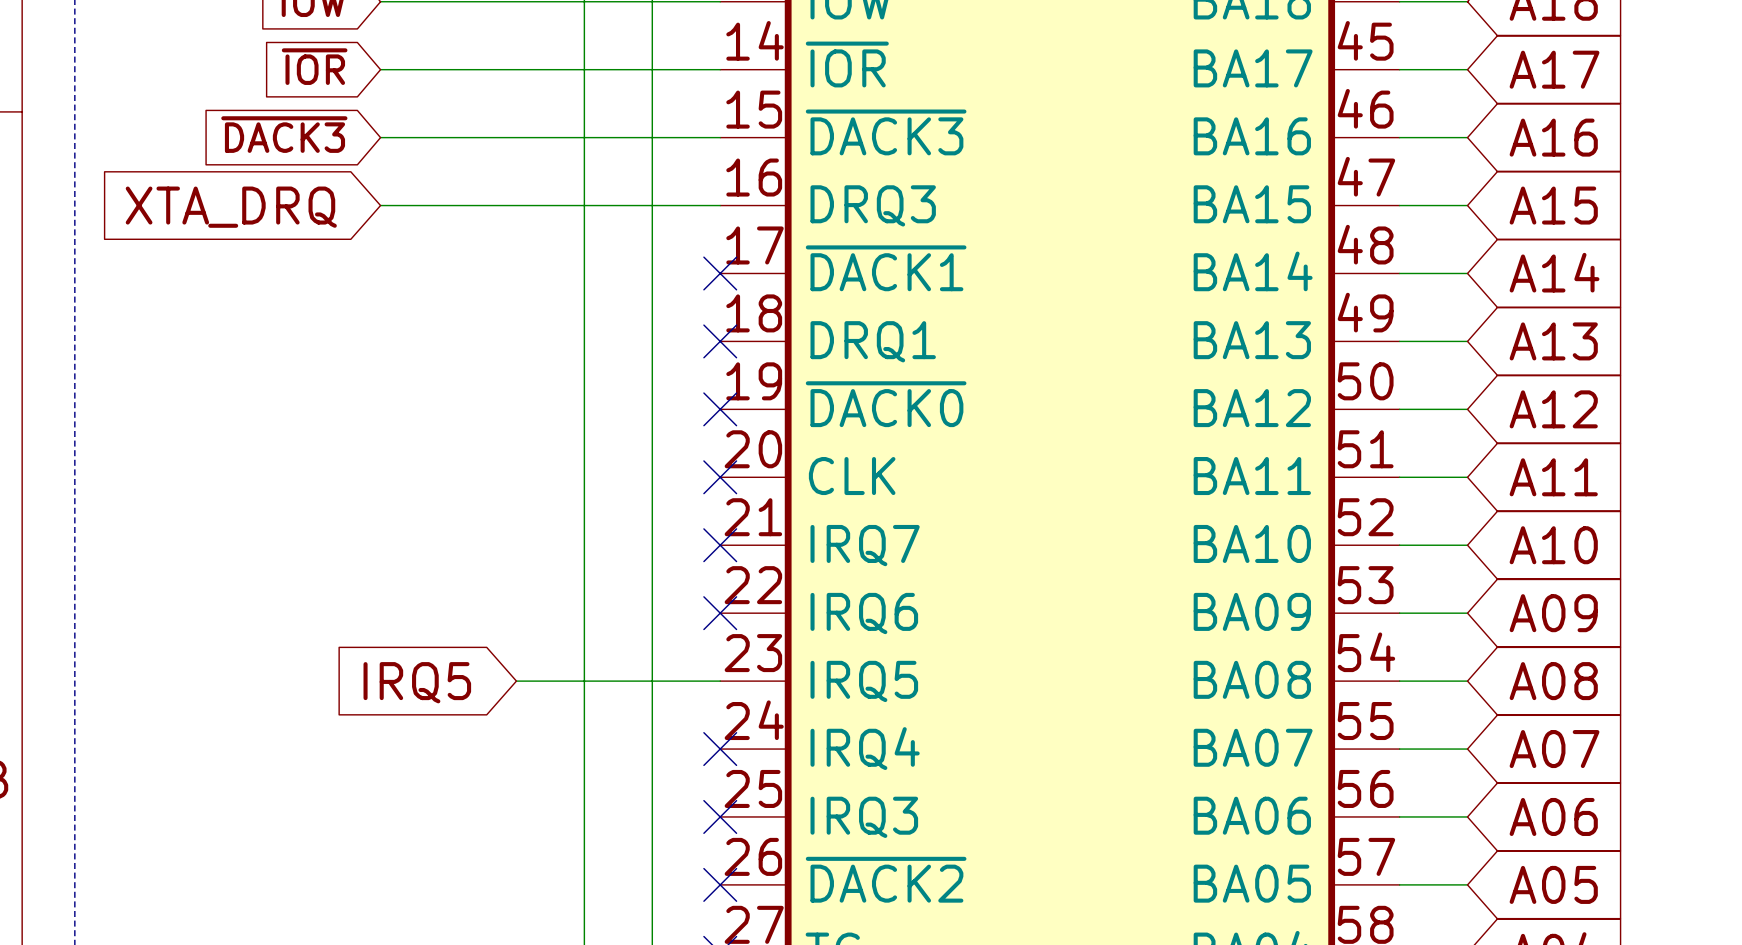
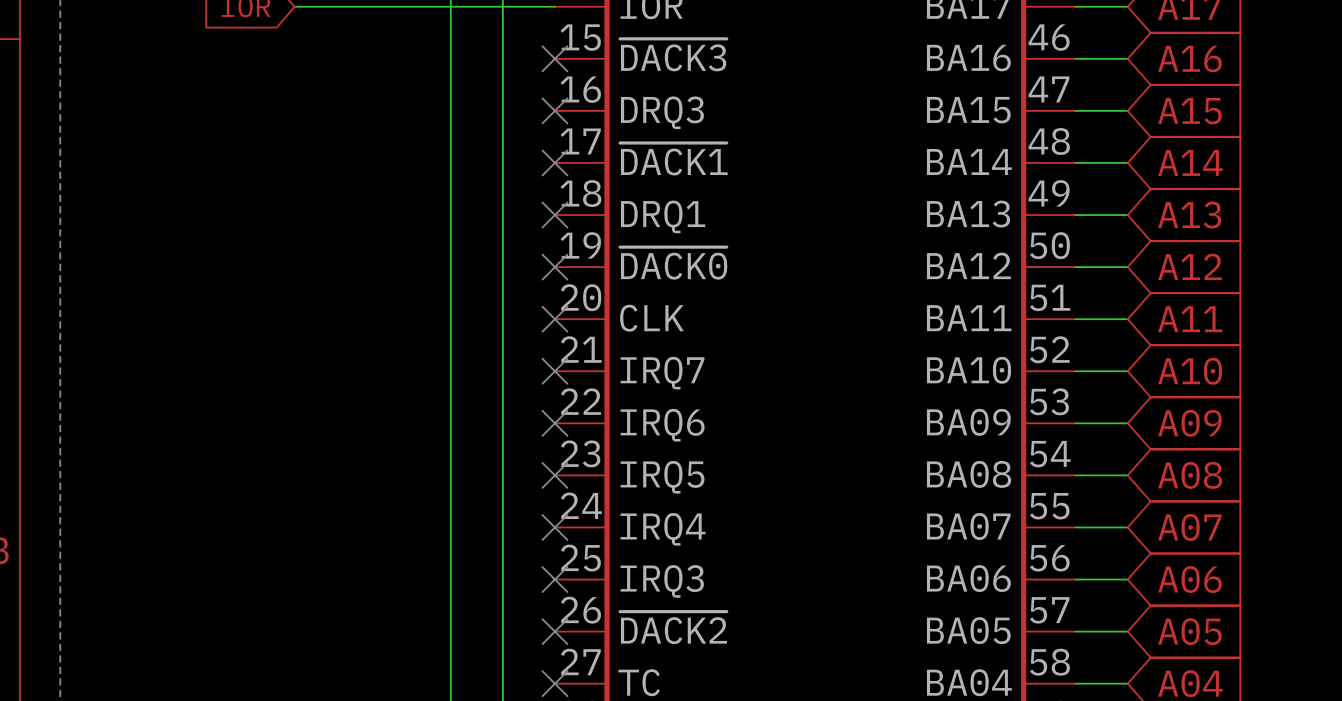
global label: ~{DACK3} (284, 134) -> none
wire: (380, 137) (720, 137) -> none
no-connect mark: none -> (554, 58)
wire: (380, 205) (720, 205) -> none
no-connect mark: none -> (554, 110)
global label: XTA_DRQ (231, 207) -> none
wire: (516, 681) (720, 681) -> none
no-connect mark: none -> (554, 475)
global label: IRQ5 (417, 682) -> none

